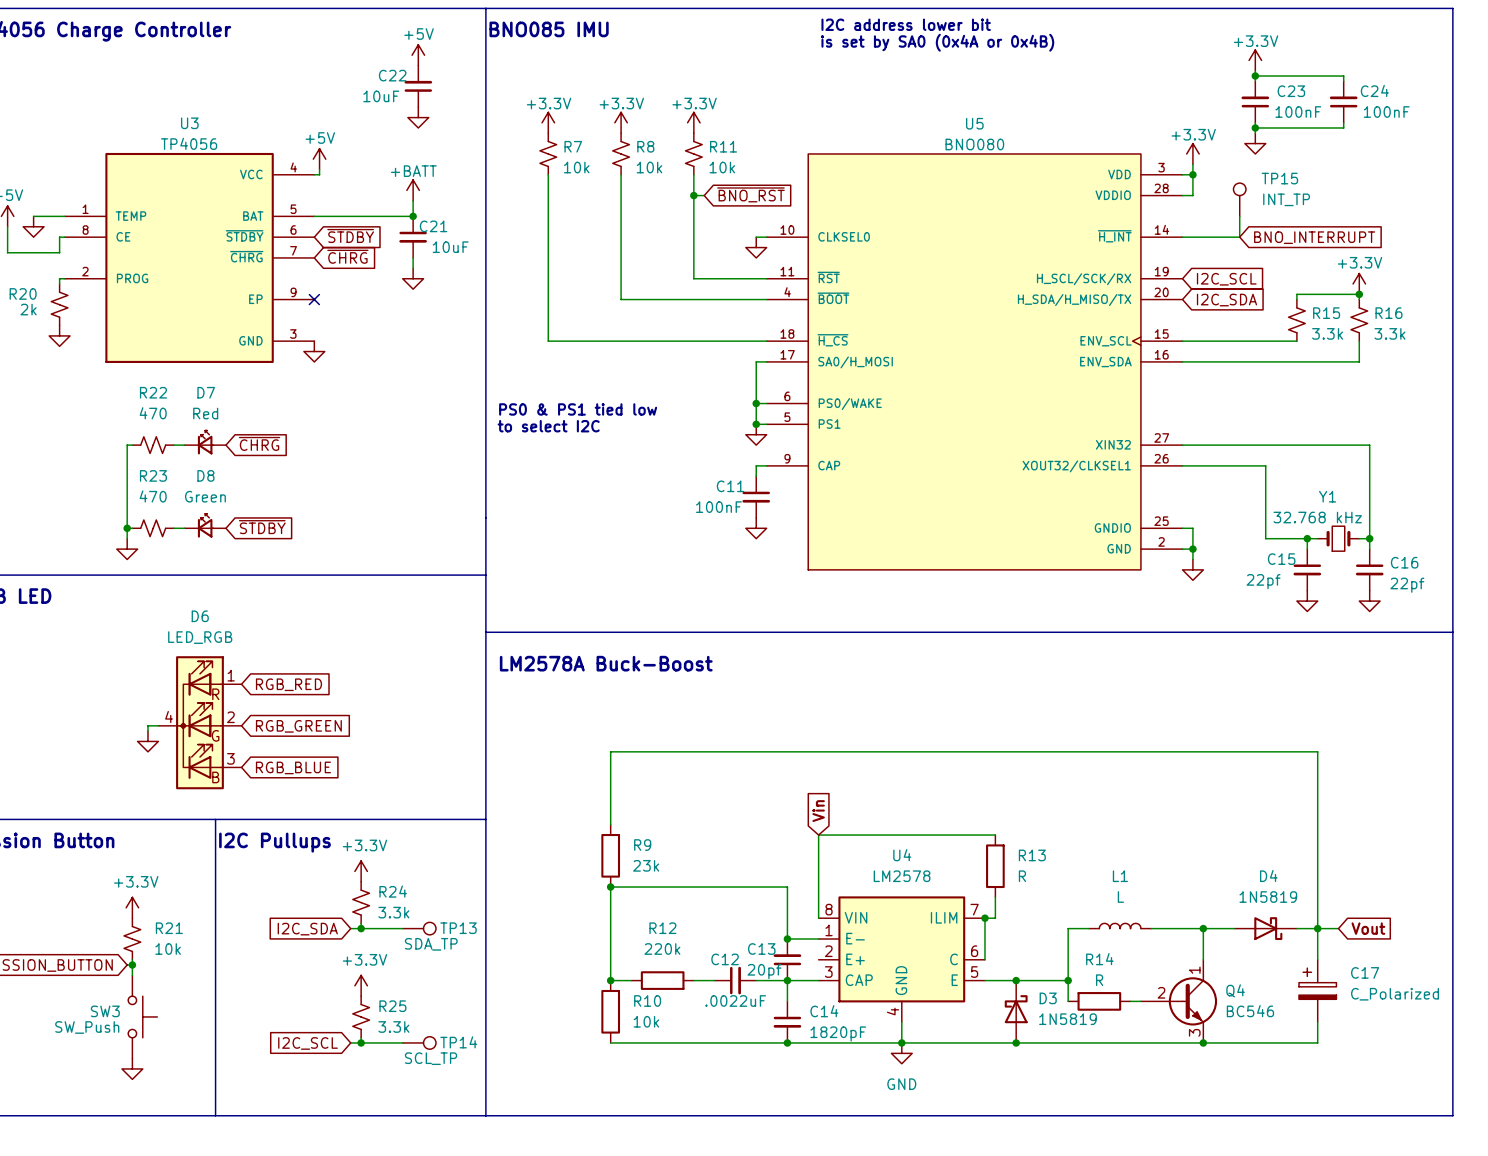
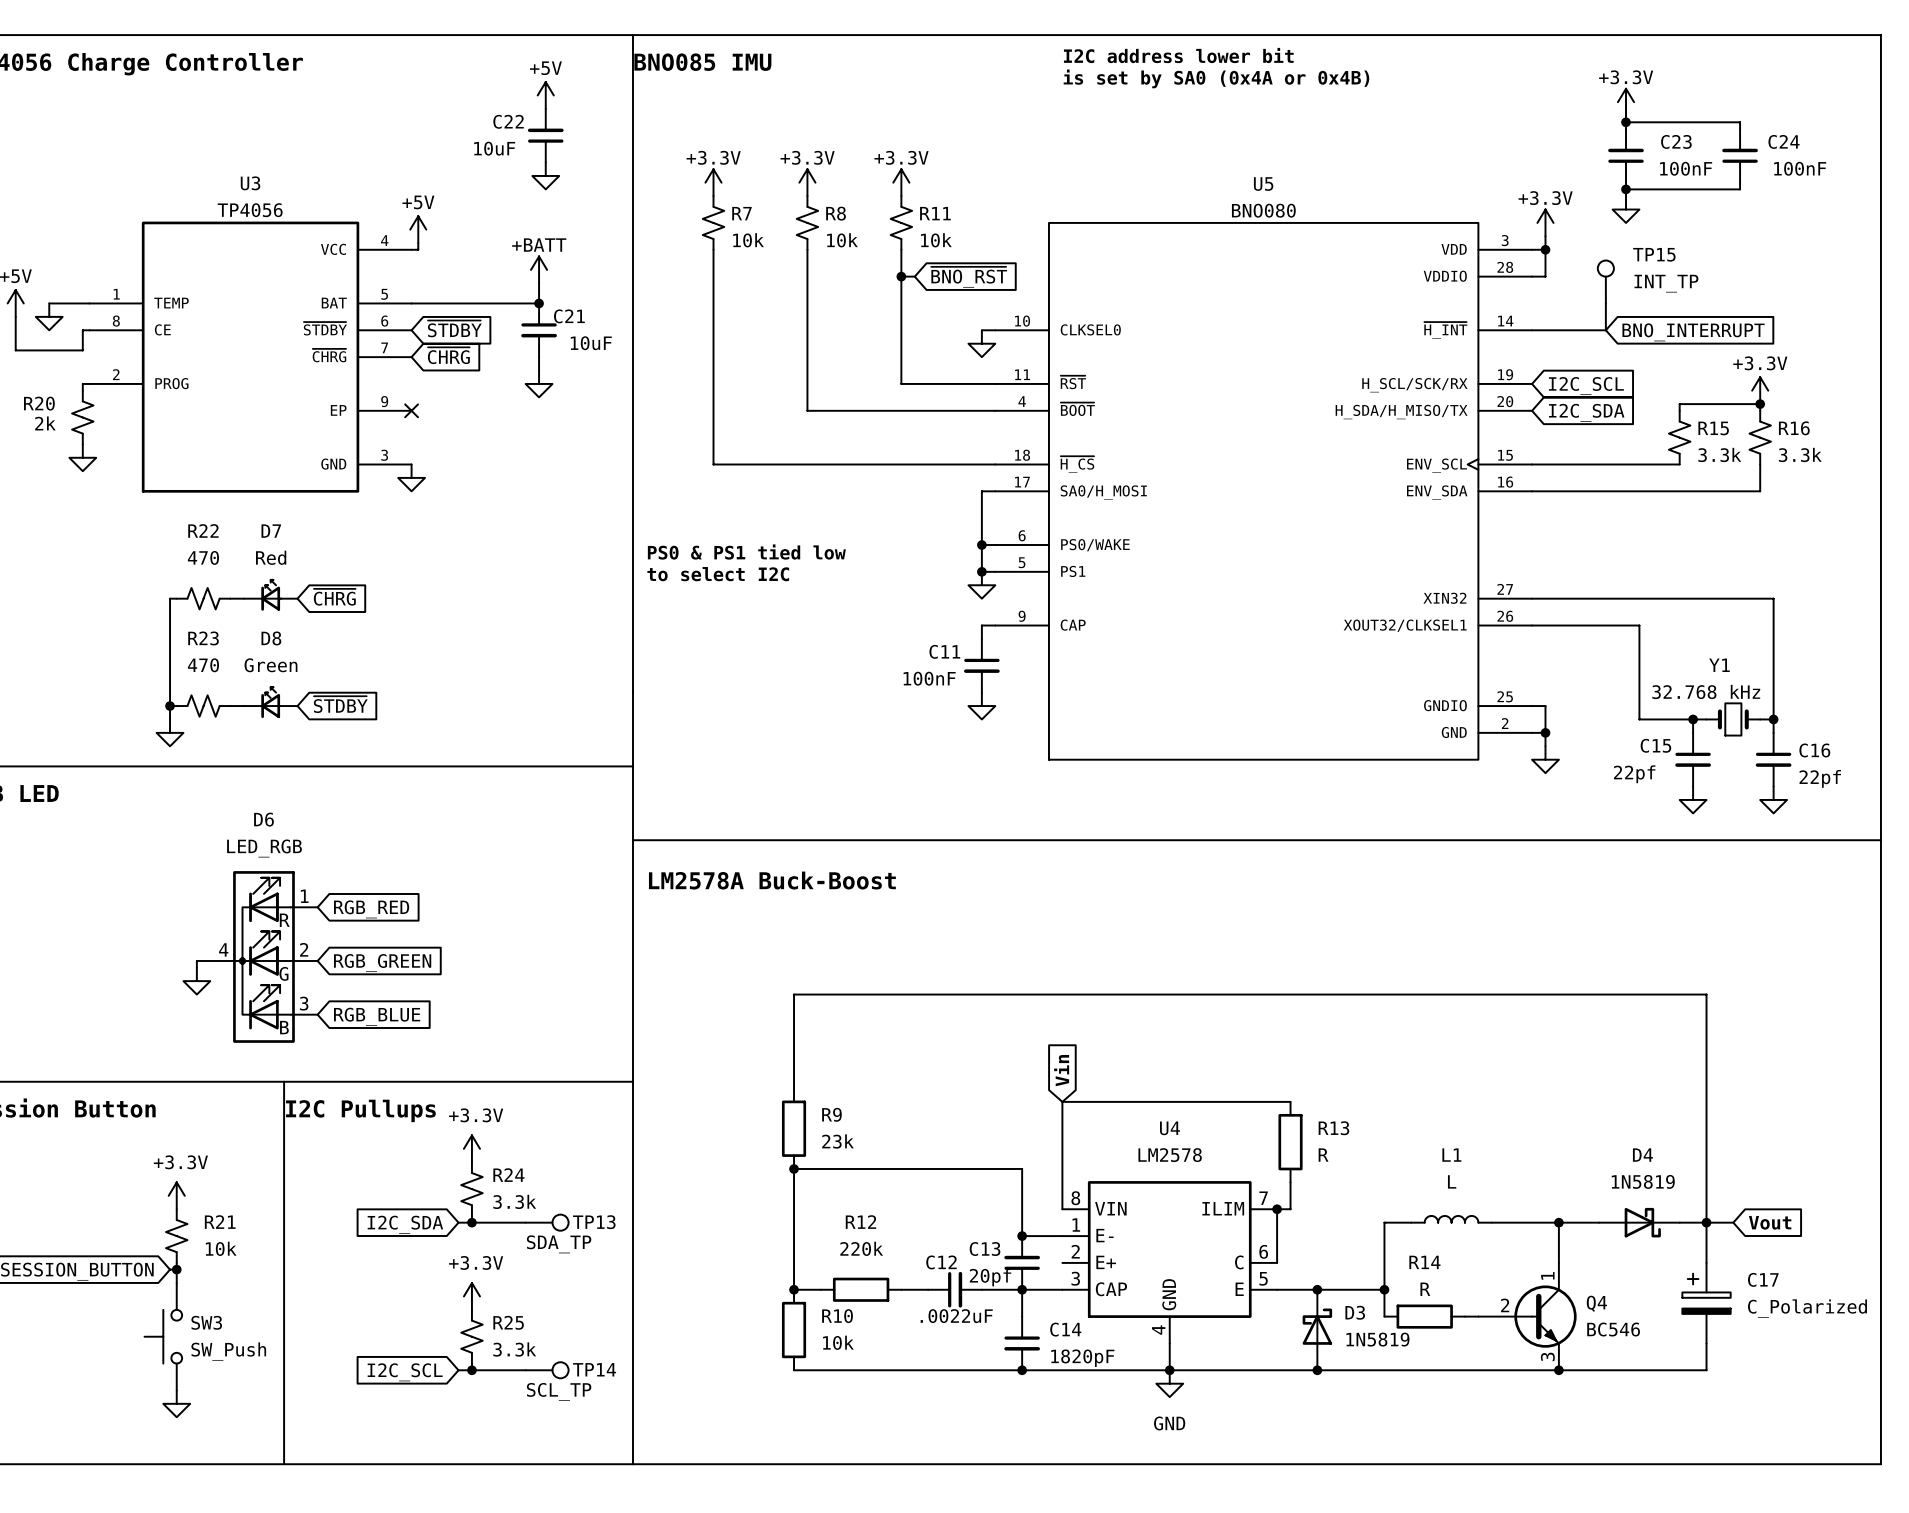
SW3 rotation: 0° (142, 1016) -> 180° (163, 1336)
SW3 value position: SW_Push (87, 1027) -> SW_Push (228, 1351)

